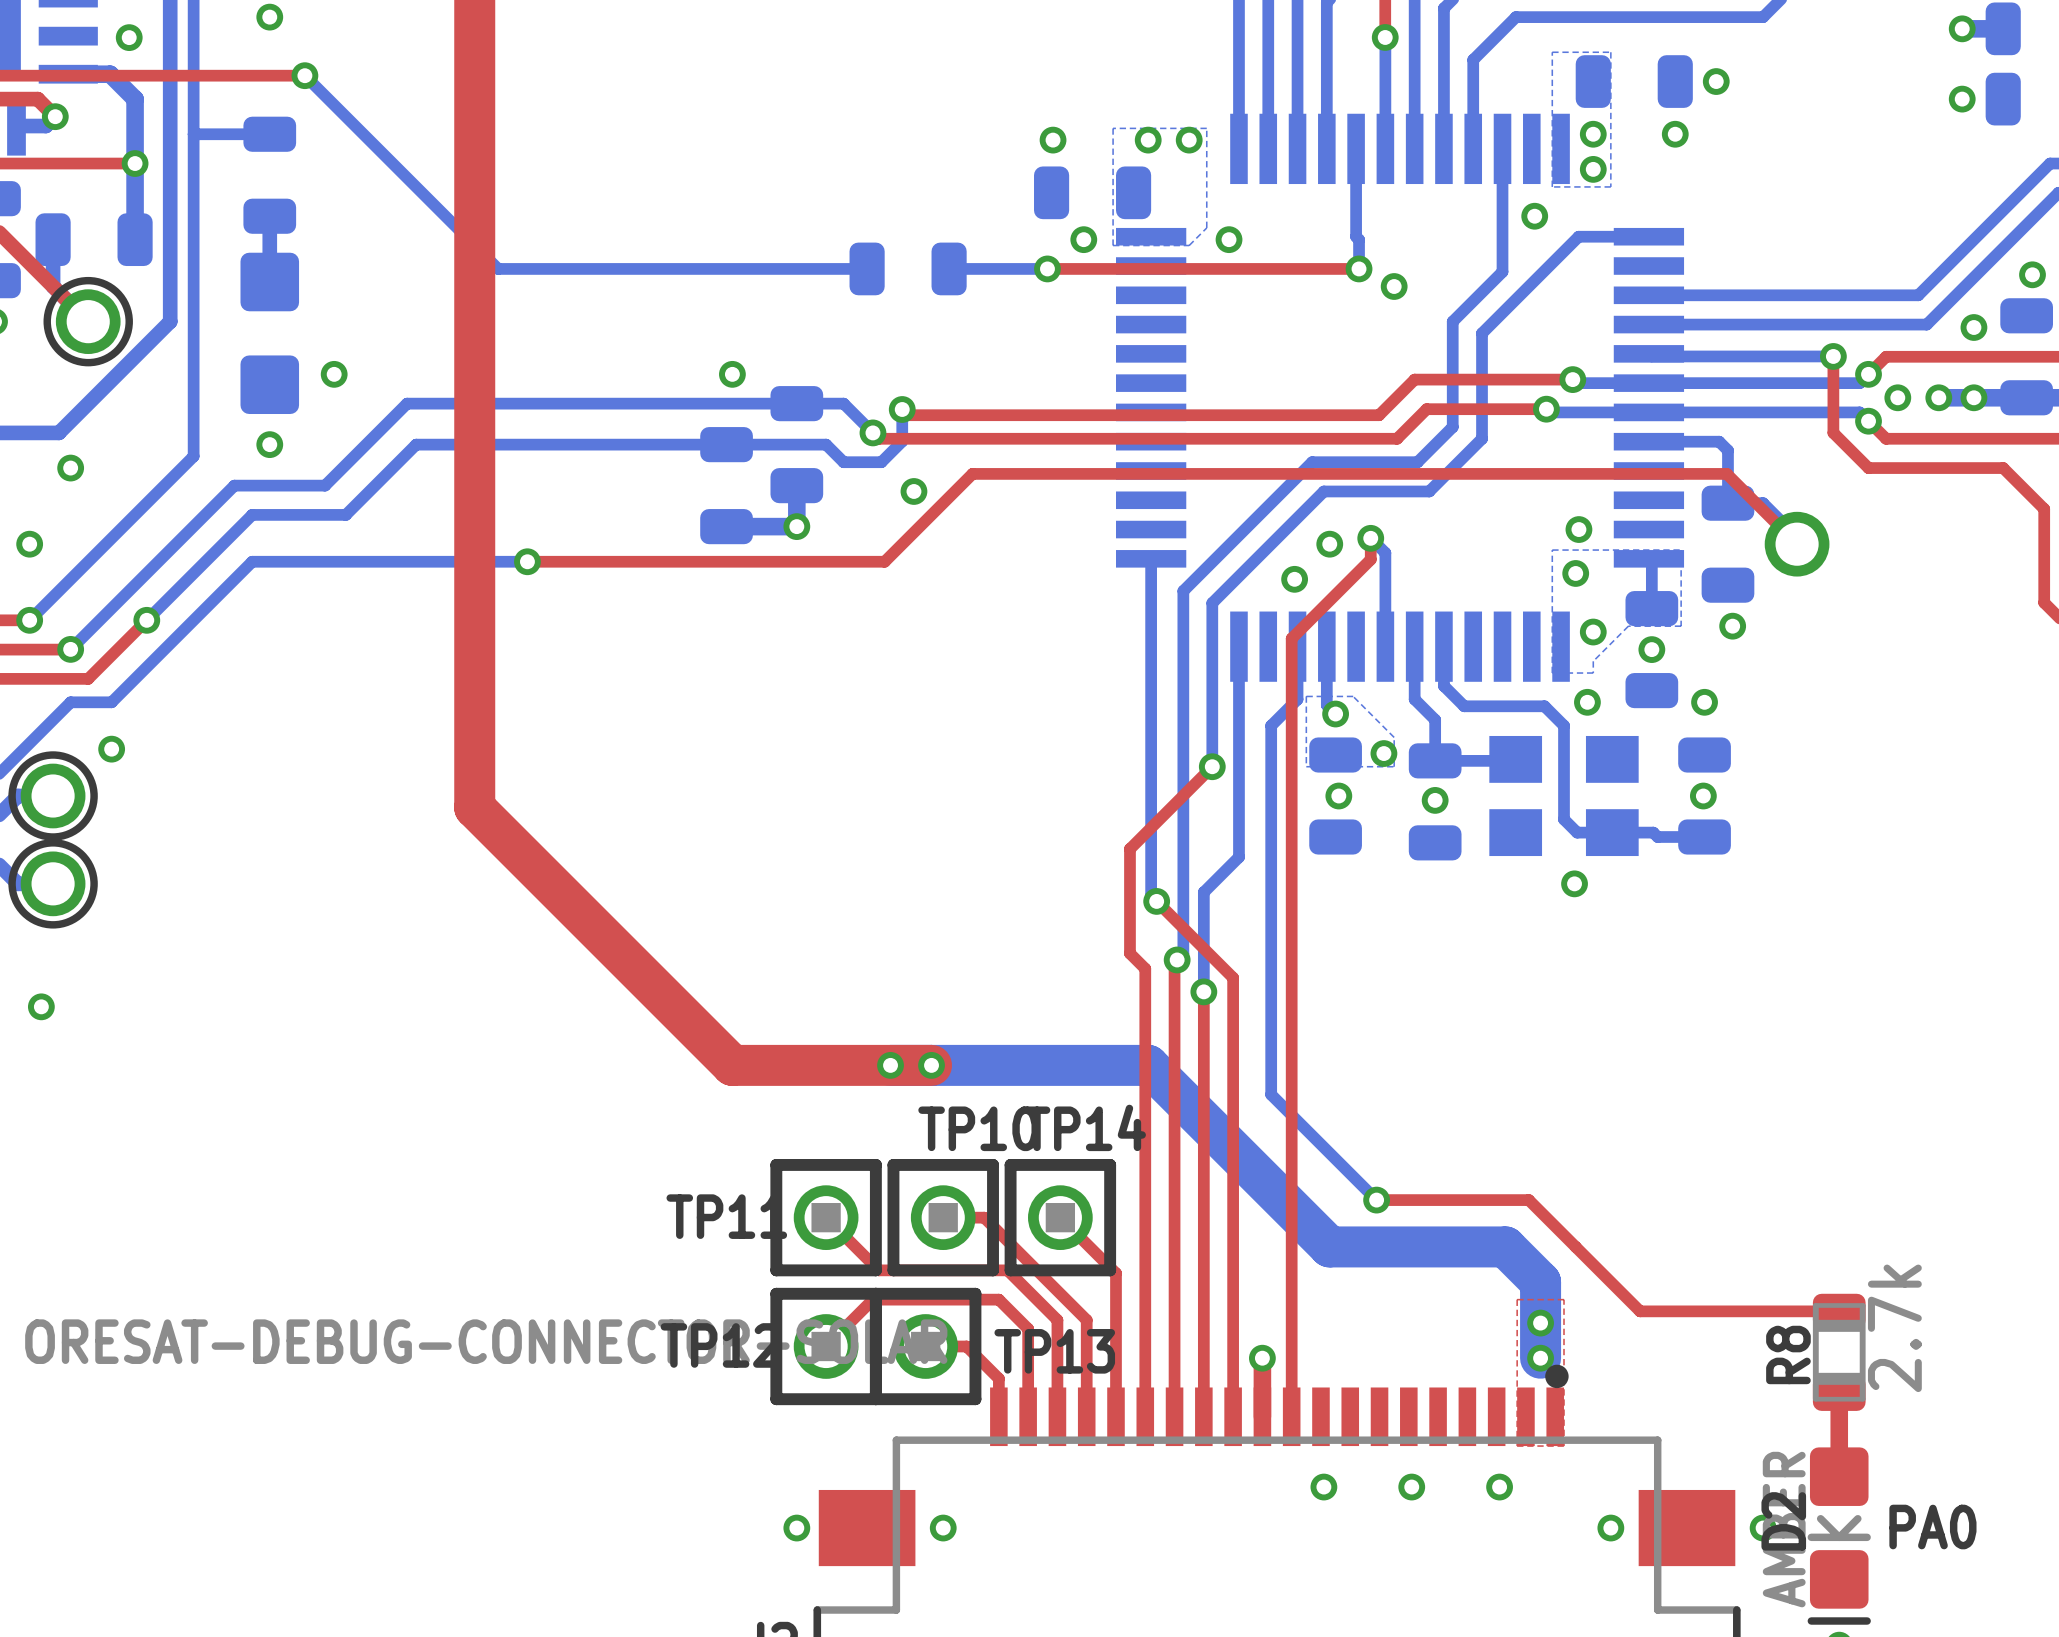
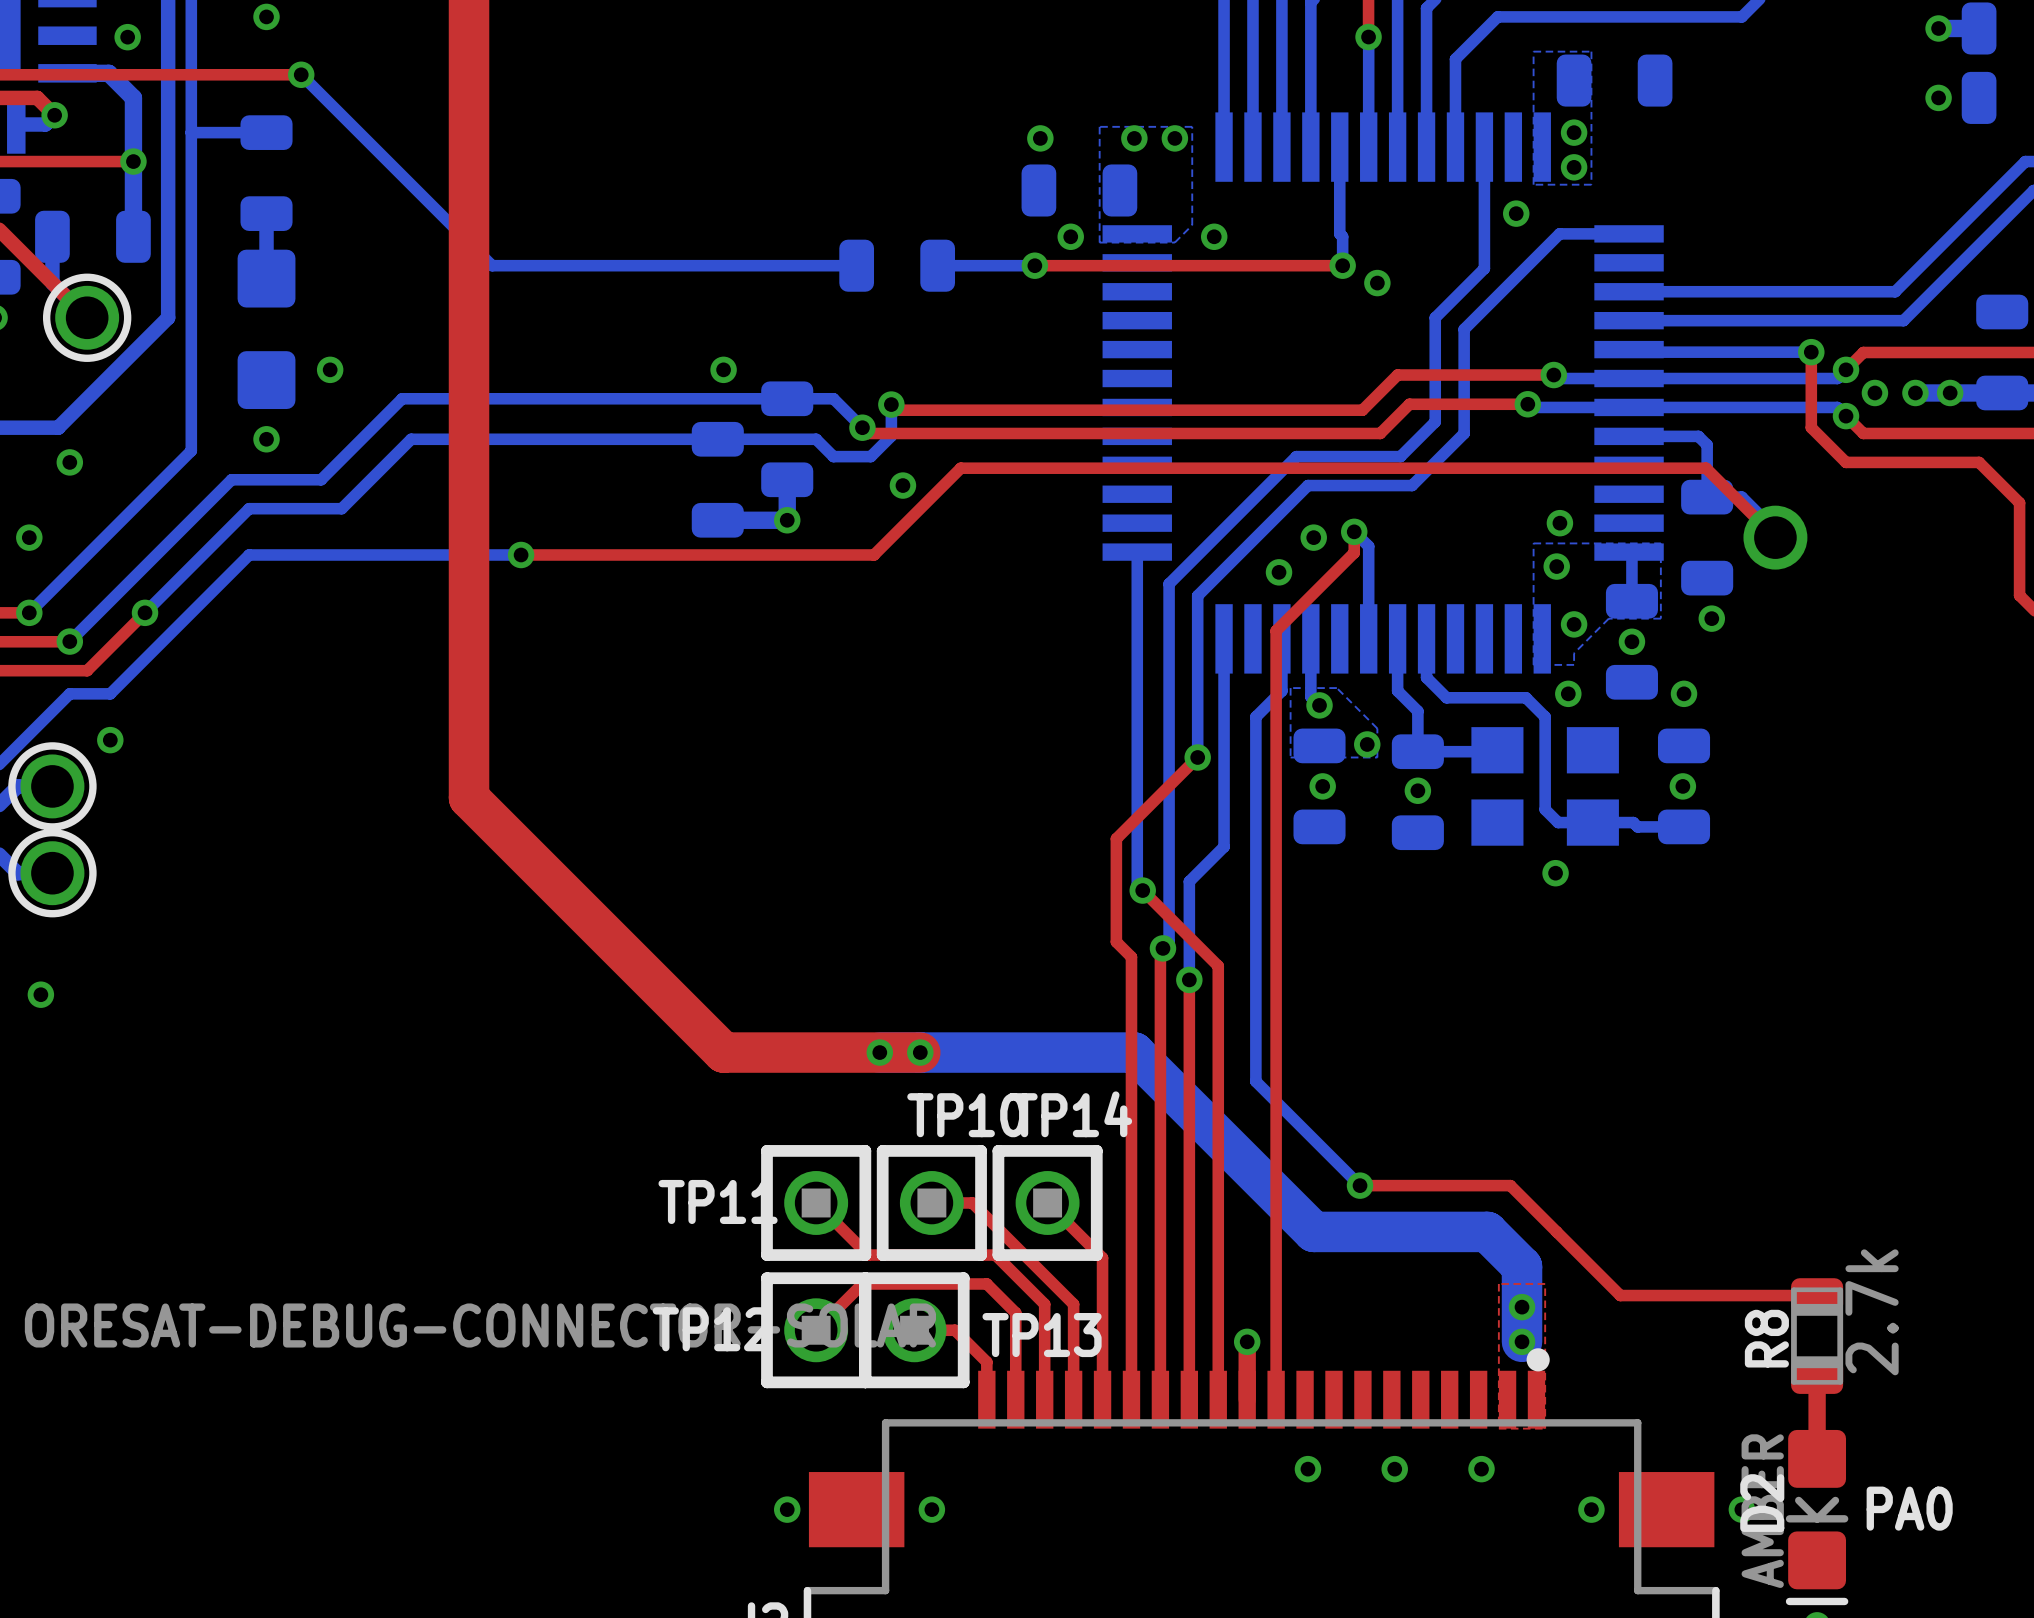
via: (1716, 81) -> none
via: (1675, 134) -> none
via: (2032, 274) -> none
via: (1973, 327) -> none

